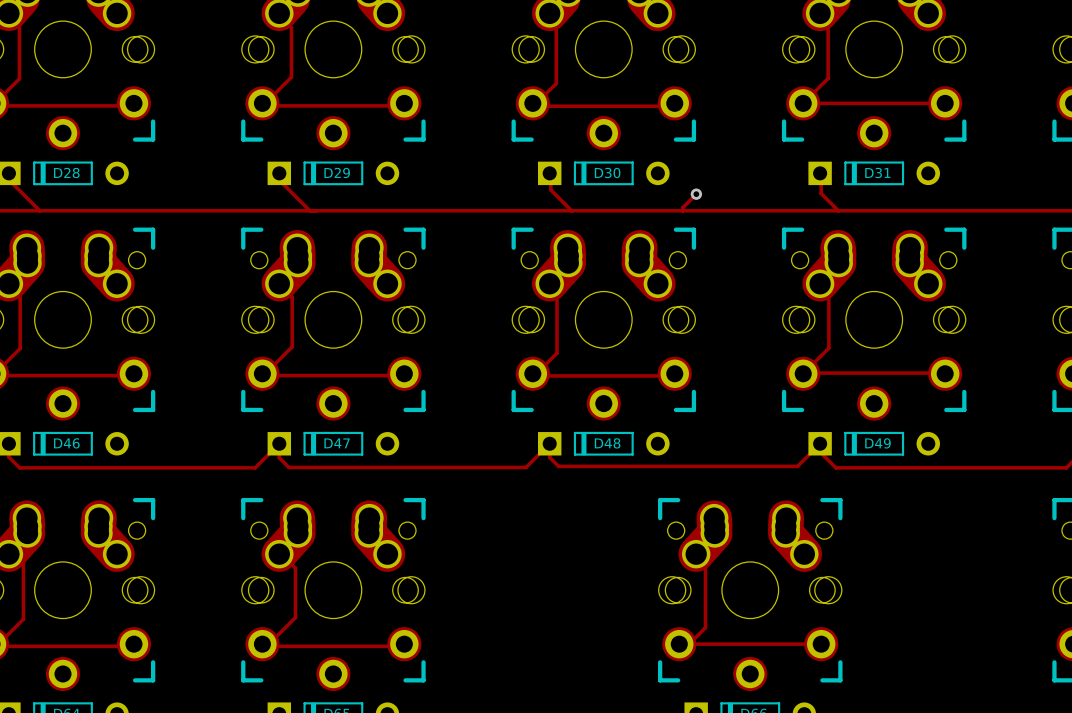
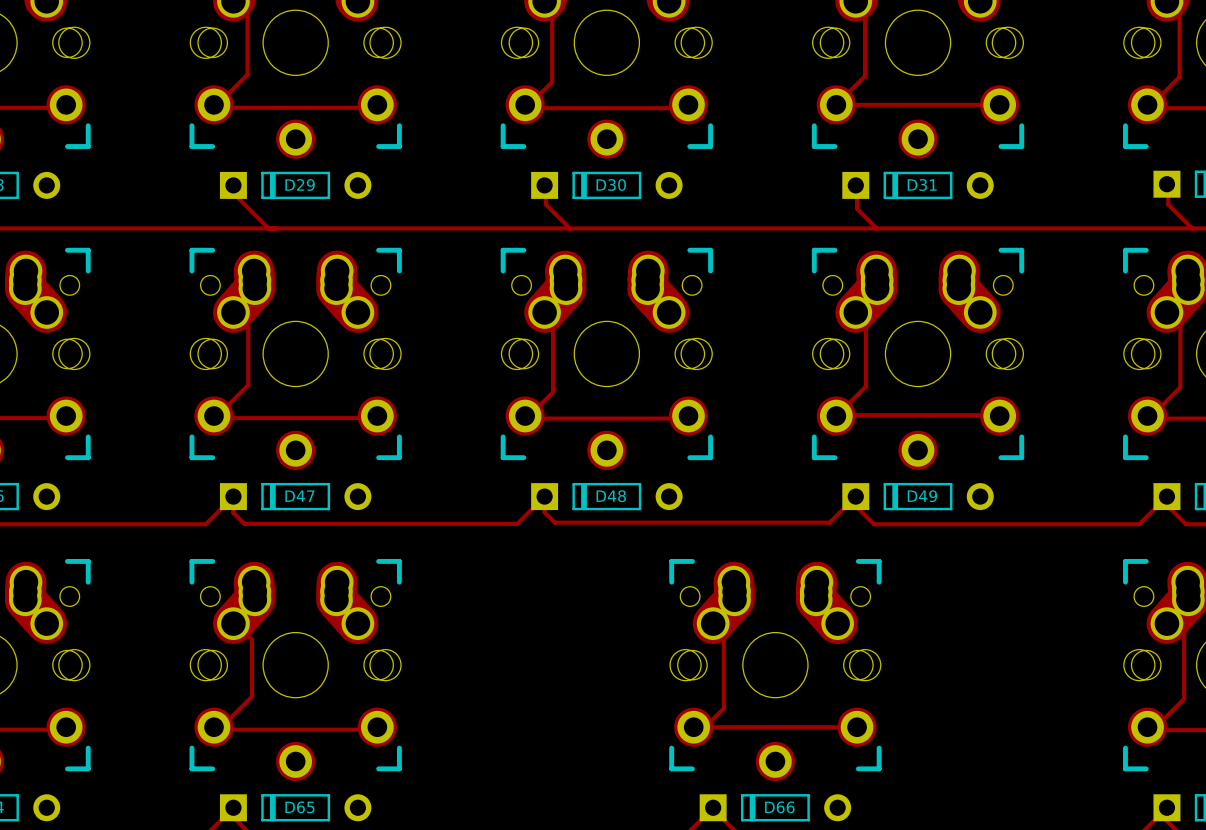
track: (696, 194) (682, 207) (682, 210) -> none
via: (696, 194) -> none

